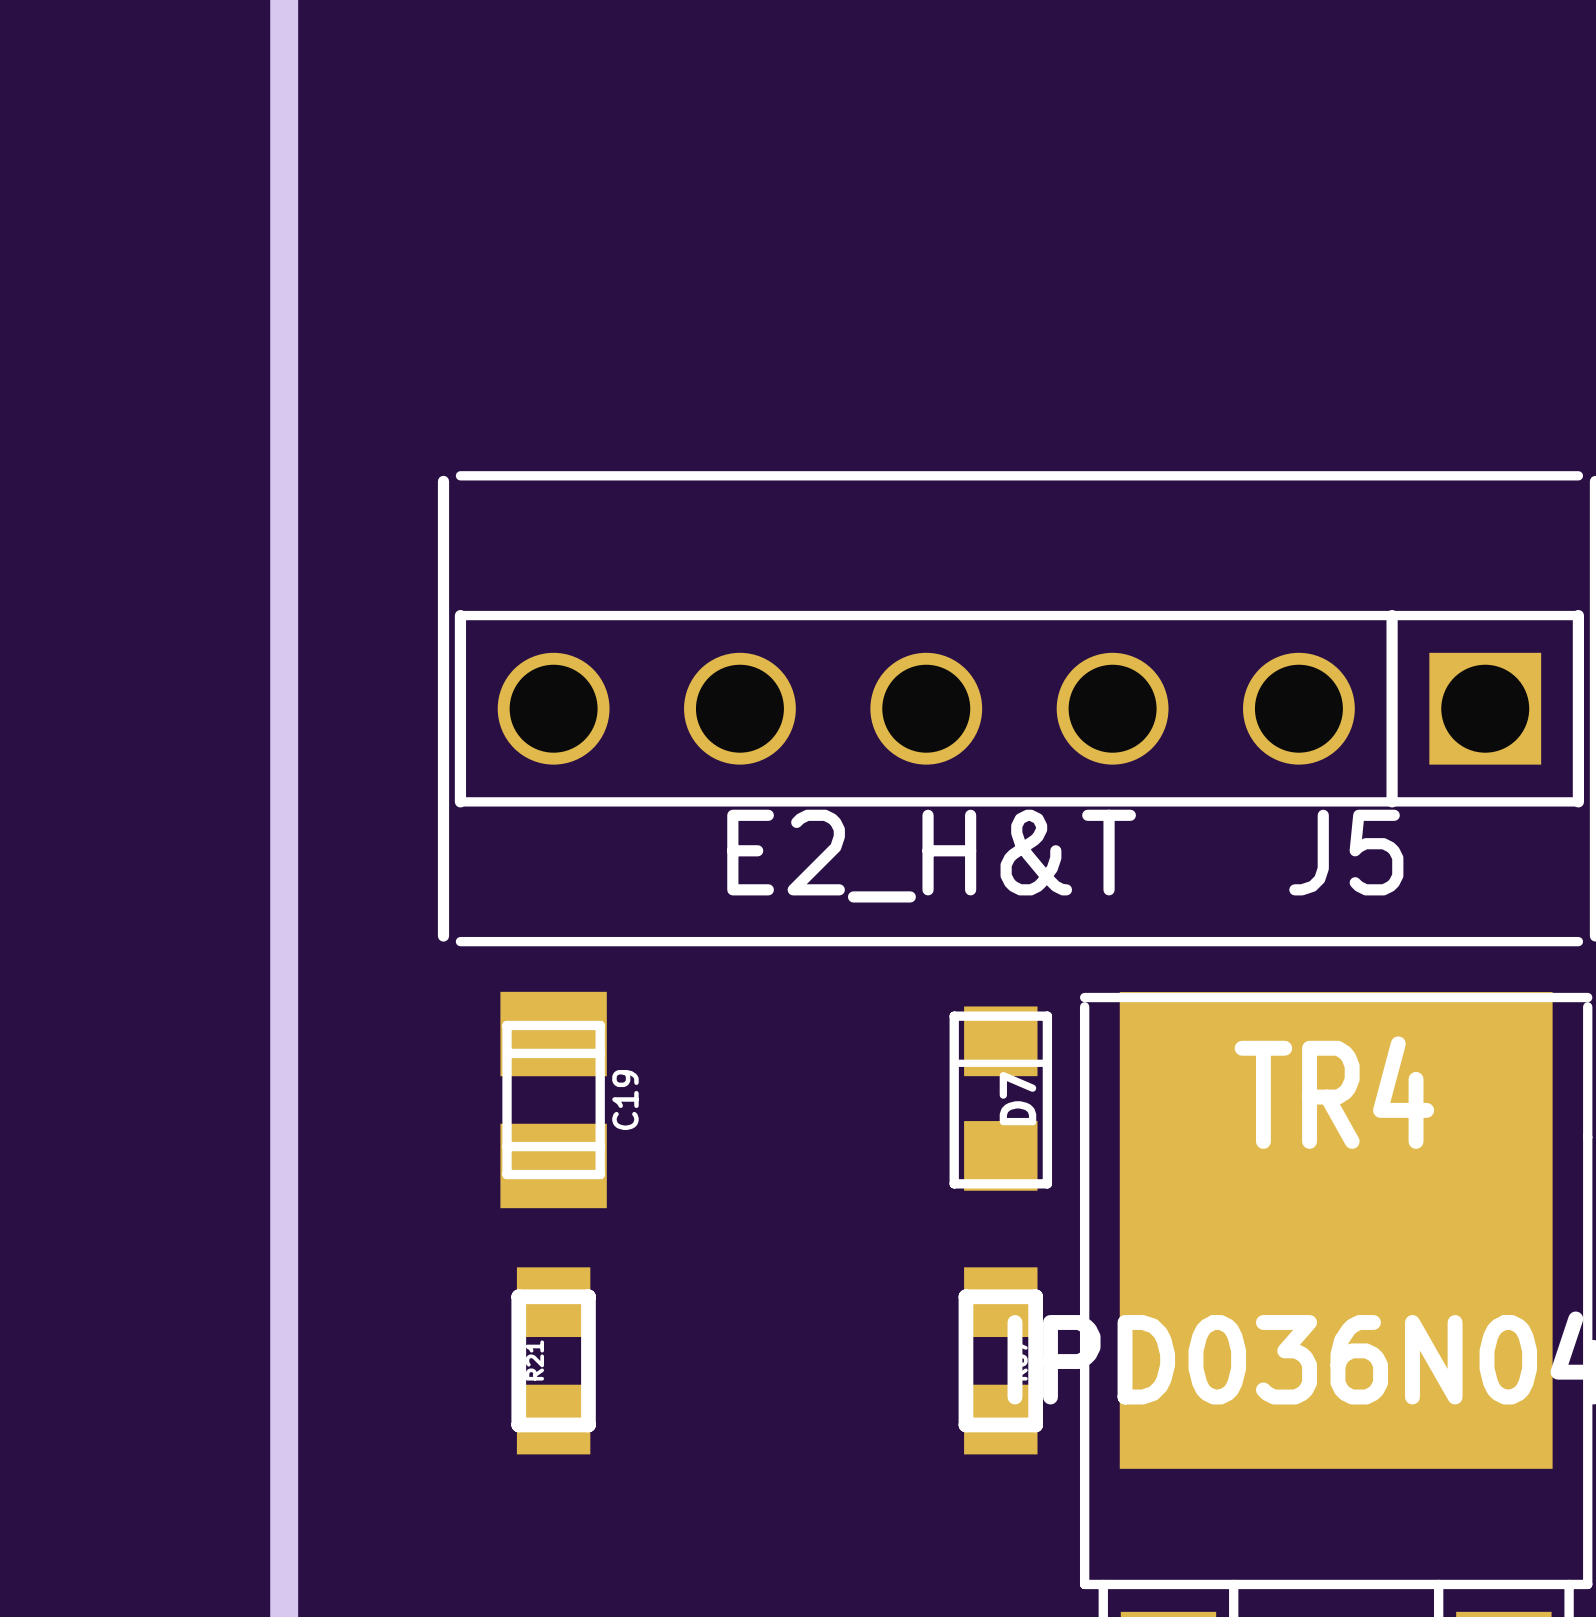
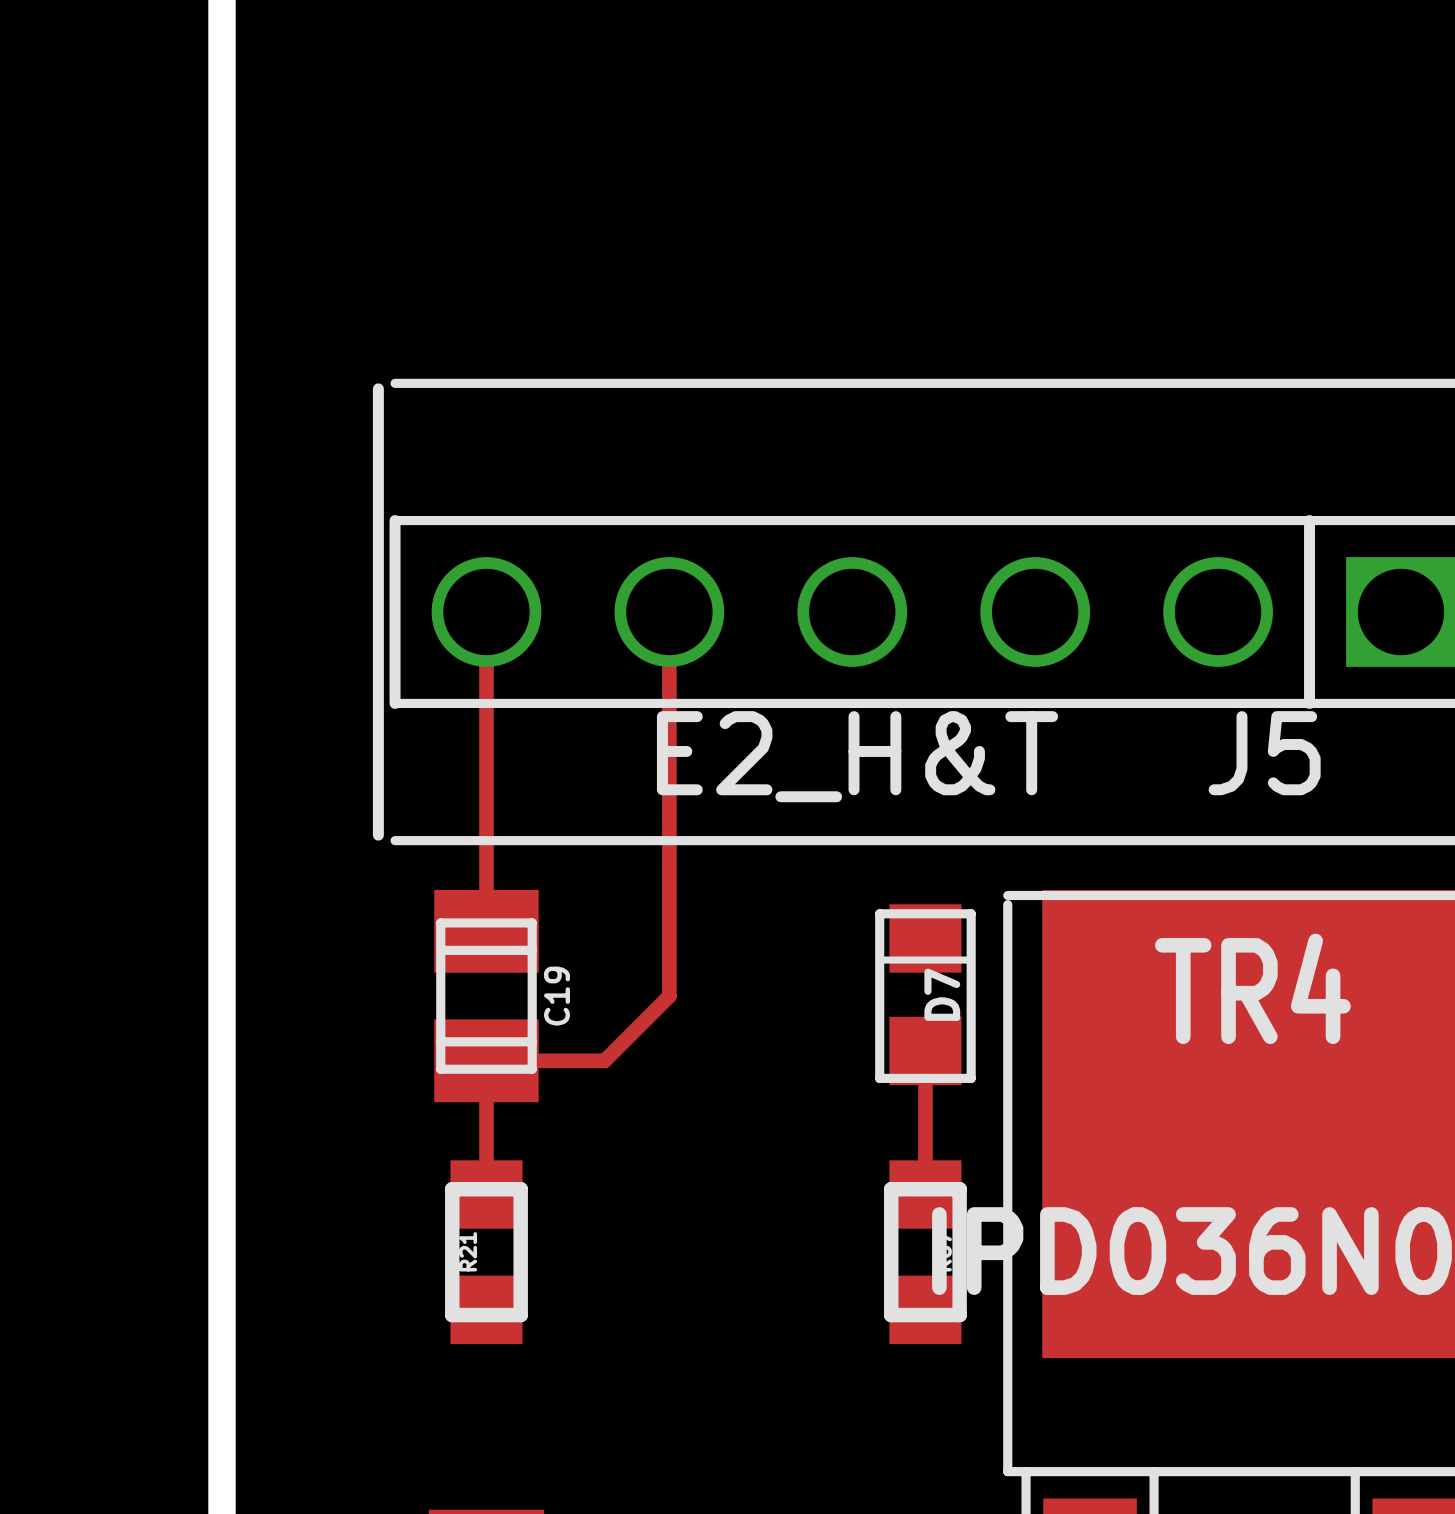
track: none -> (486, 611) (486, 931)
track: none -> (669, 611) (669, 996) (604, 1060) (486, 1060) (486, 1194)
track: none -> (925, 1050) (925, 1194)

